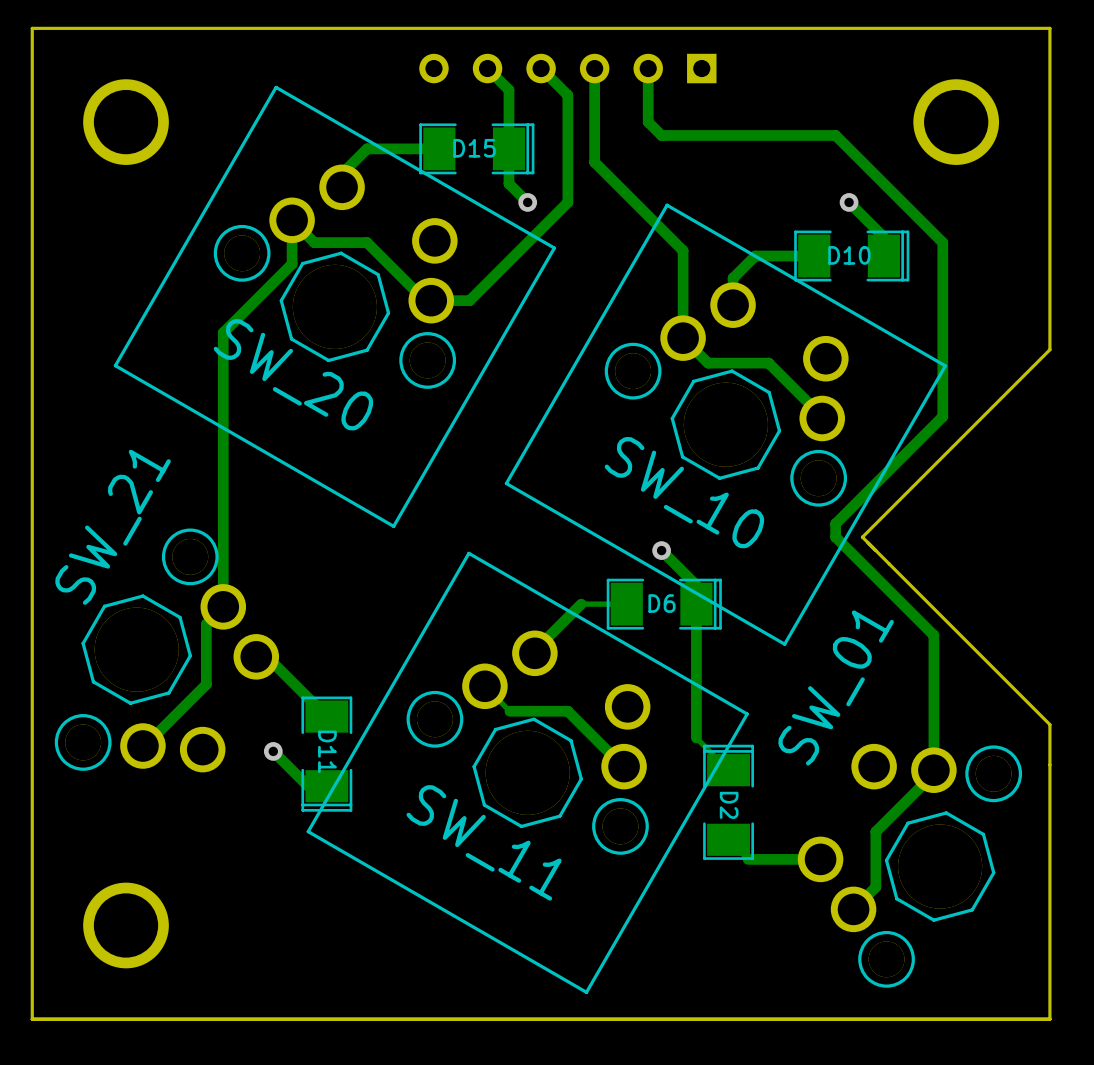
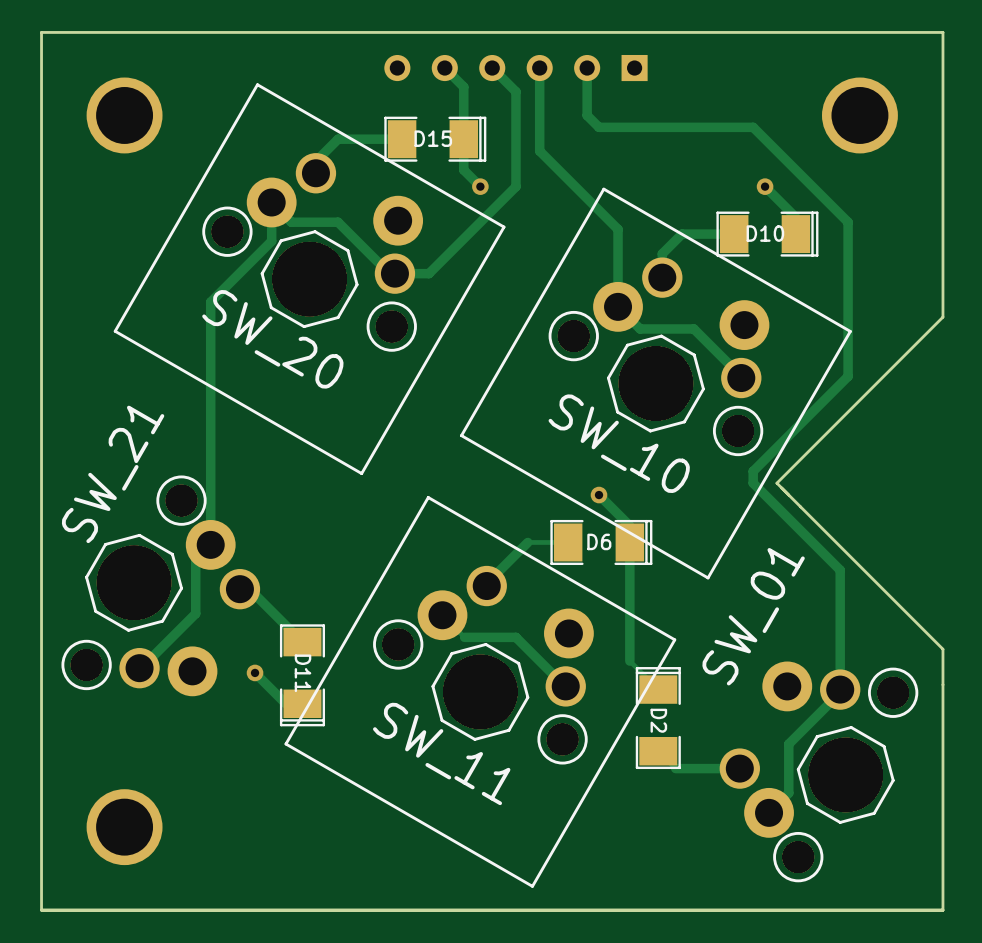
part footprint: [113, 85, 556, 528] -> [113, 83, 506, 476]
part footprint: [504, 203, 947, 646] -> [460, 187, 852, 580]
part footprint: [306, 551, 749, 994] -> [284, 496, 677, 888]
part: none -> SW_21 (153, 590)
part: SW_21 (212, 678) -> none
part: SW_01 (863, 838) -> none
part: none -> SW_01 (826, 767)

